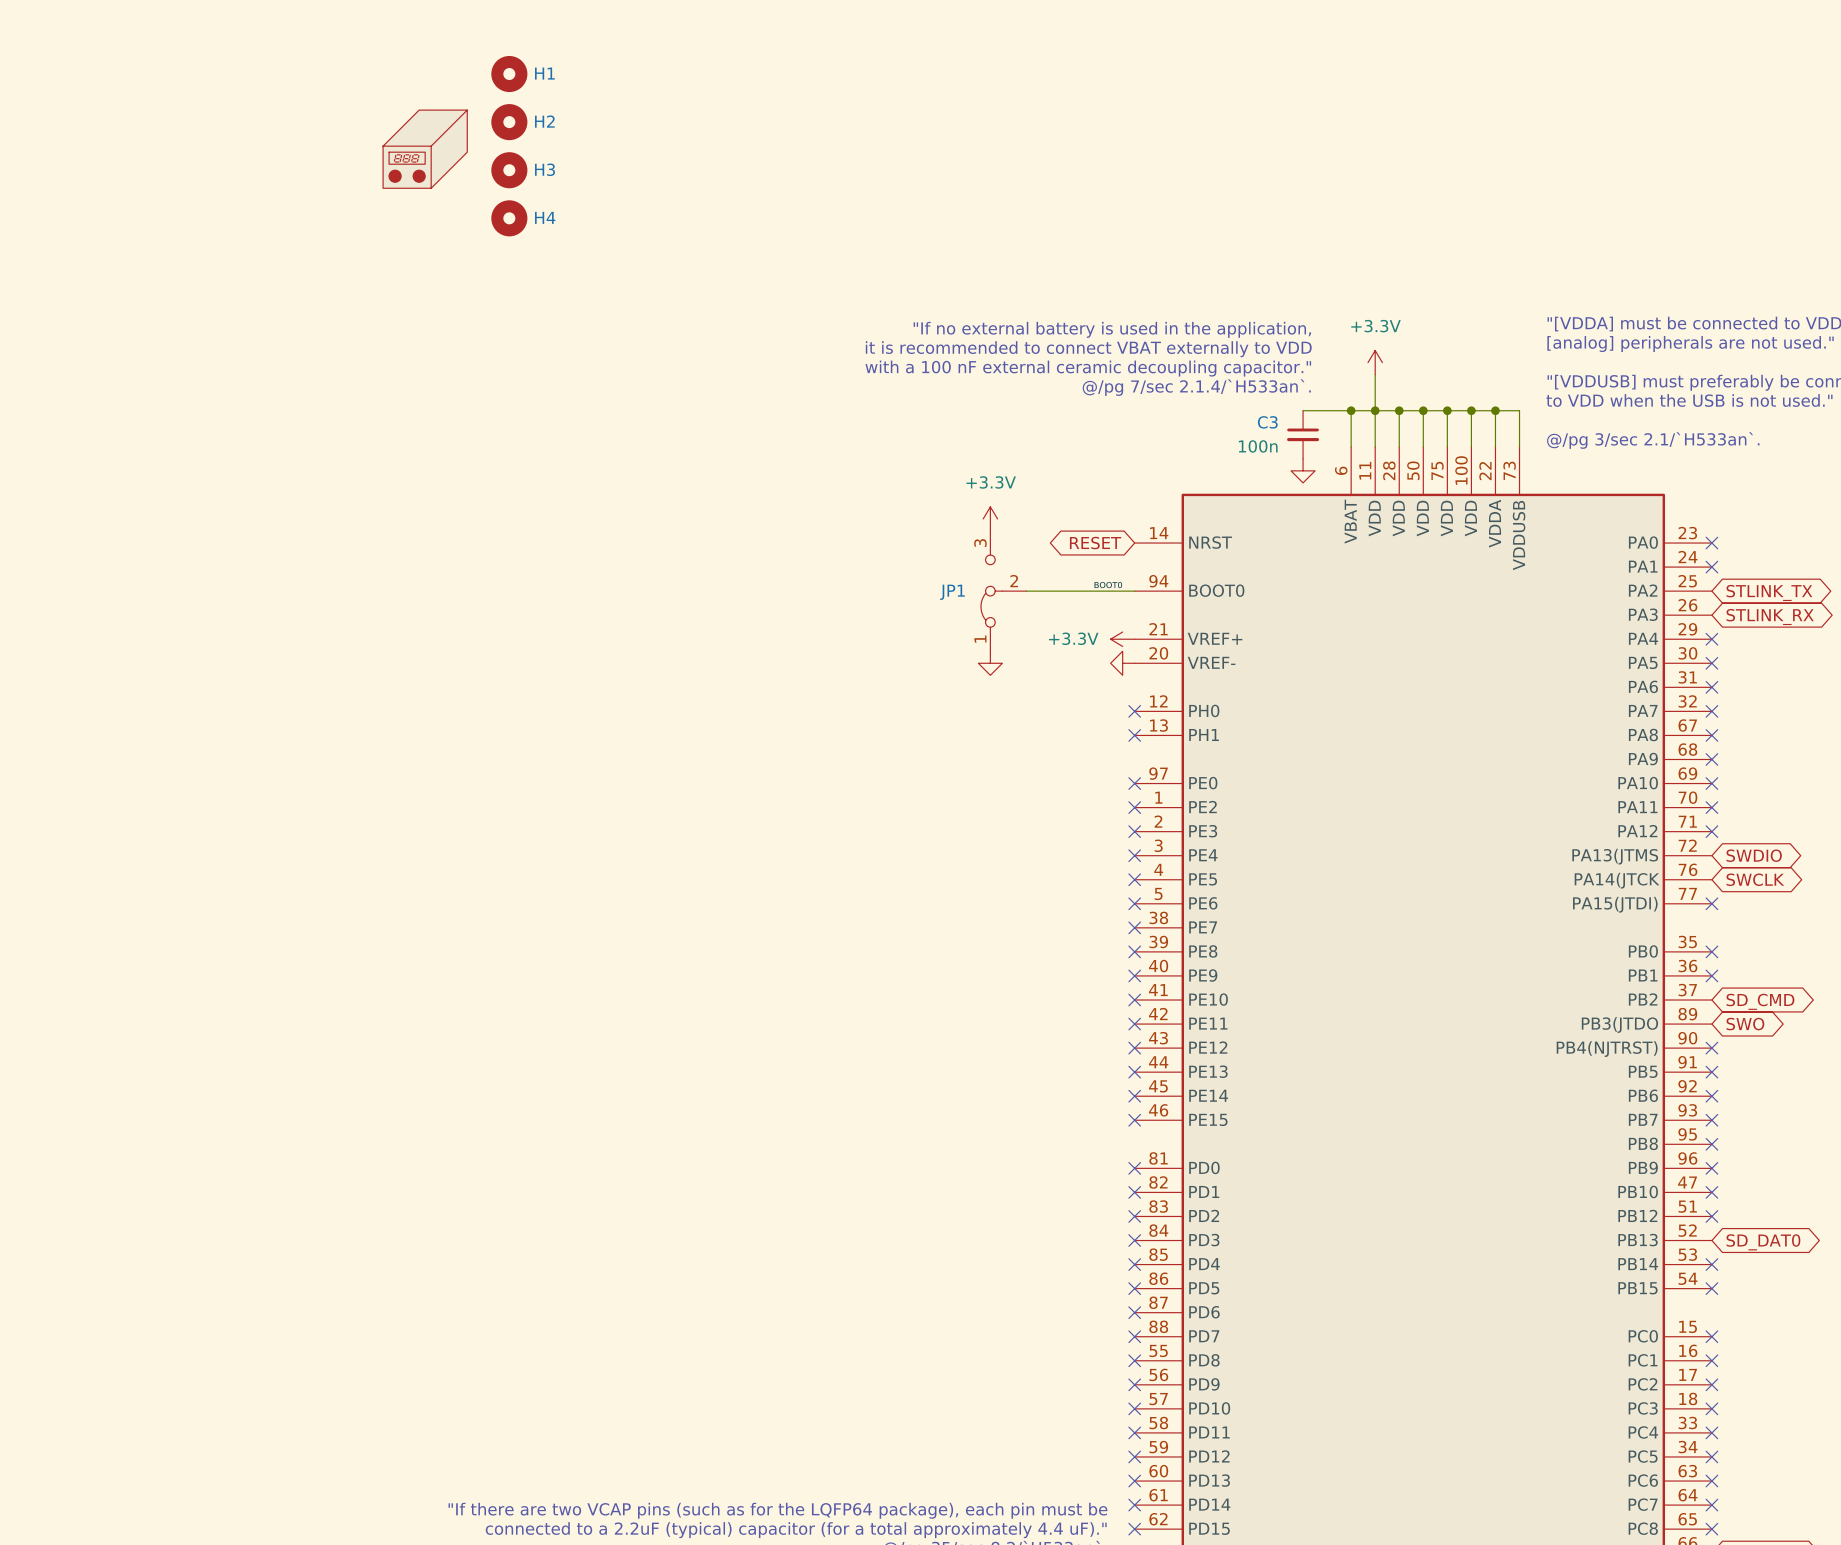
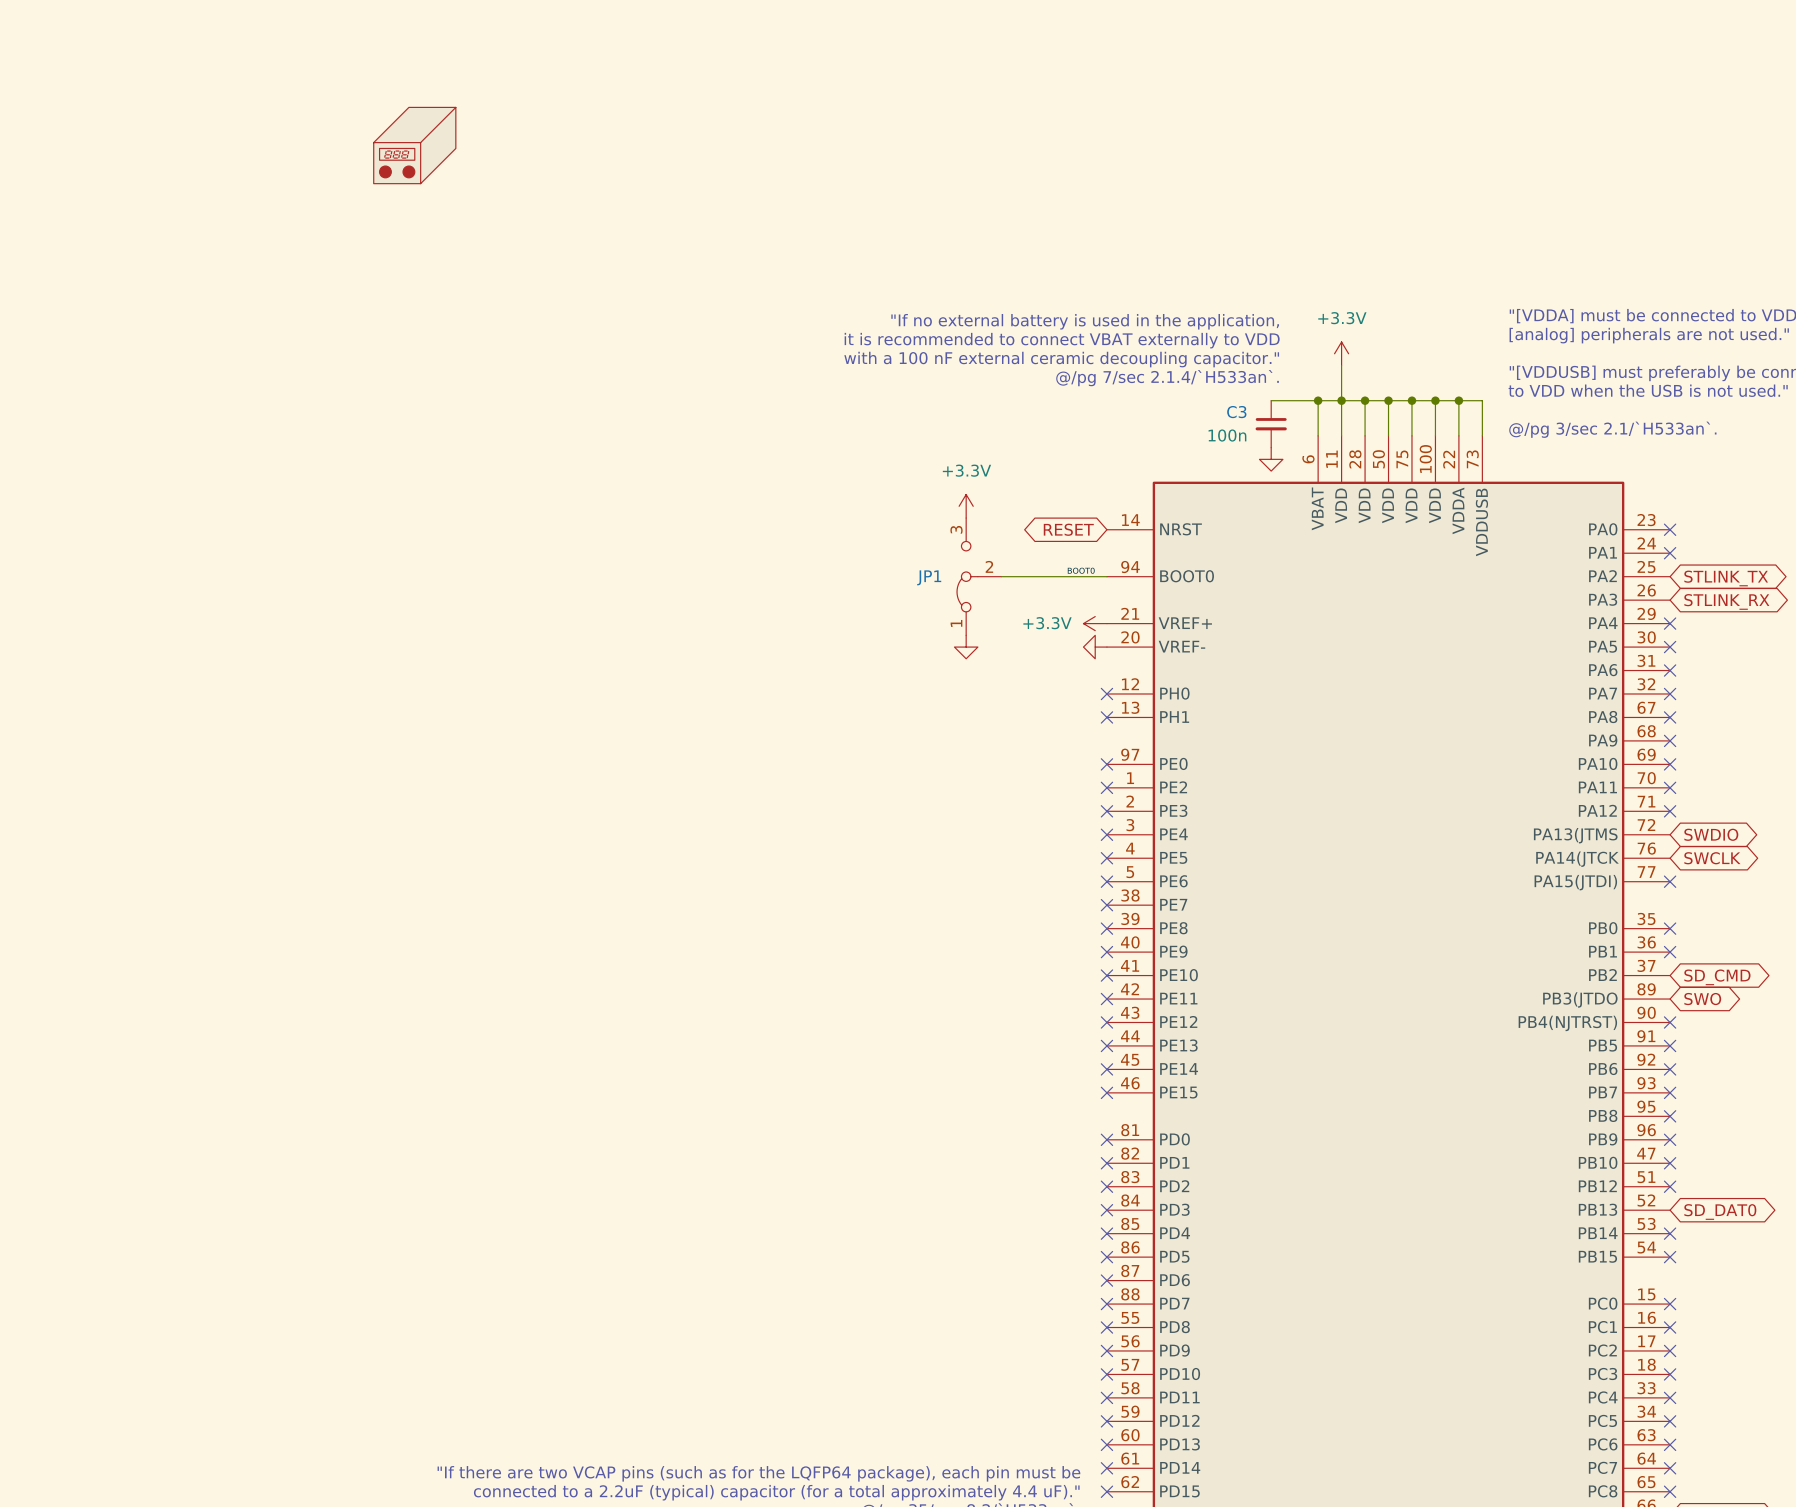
H1: (509, 74) -> none
H2: (509, 122) -> none
H3: (509, 170) -> none
H4: (509, 218) -> none

